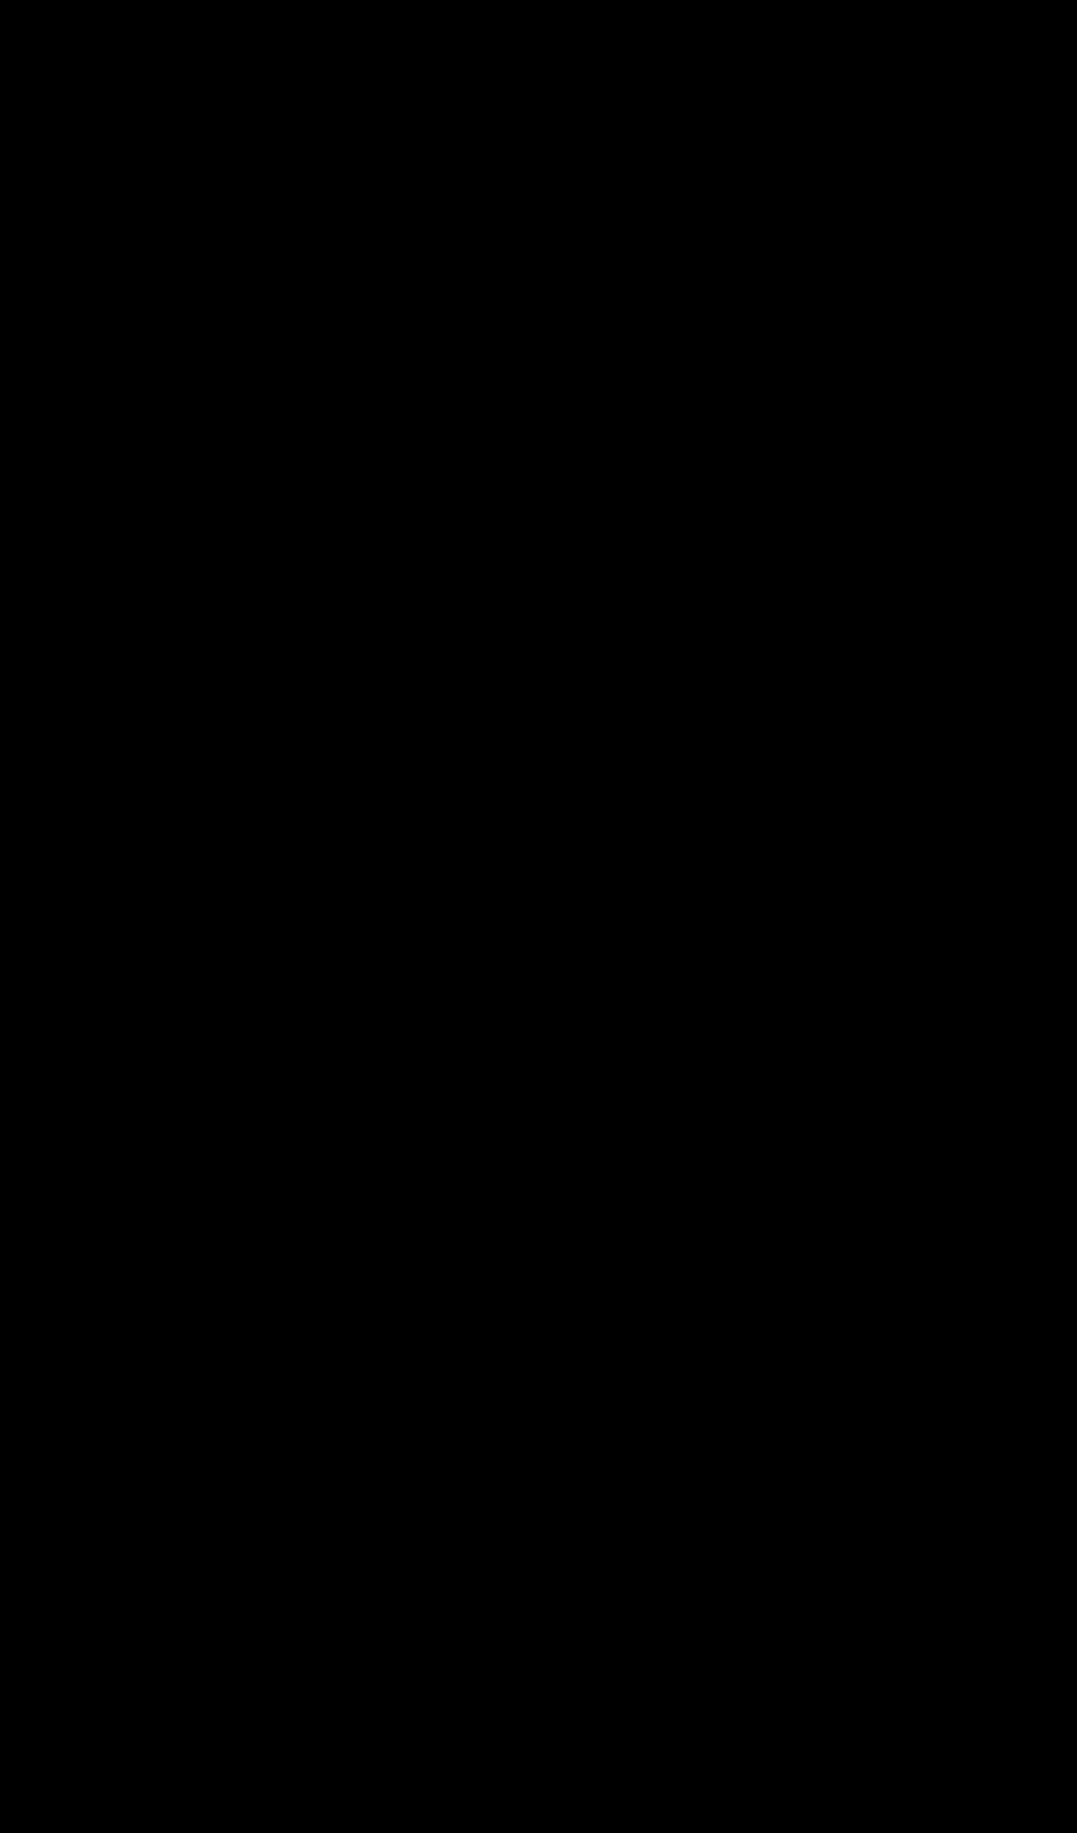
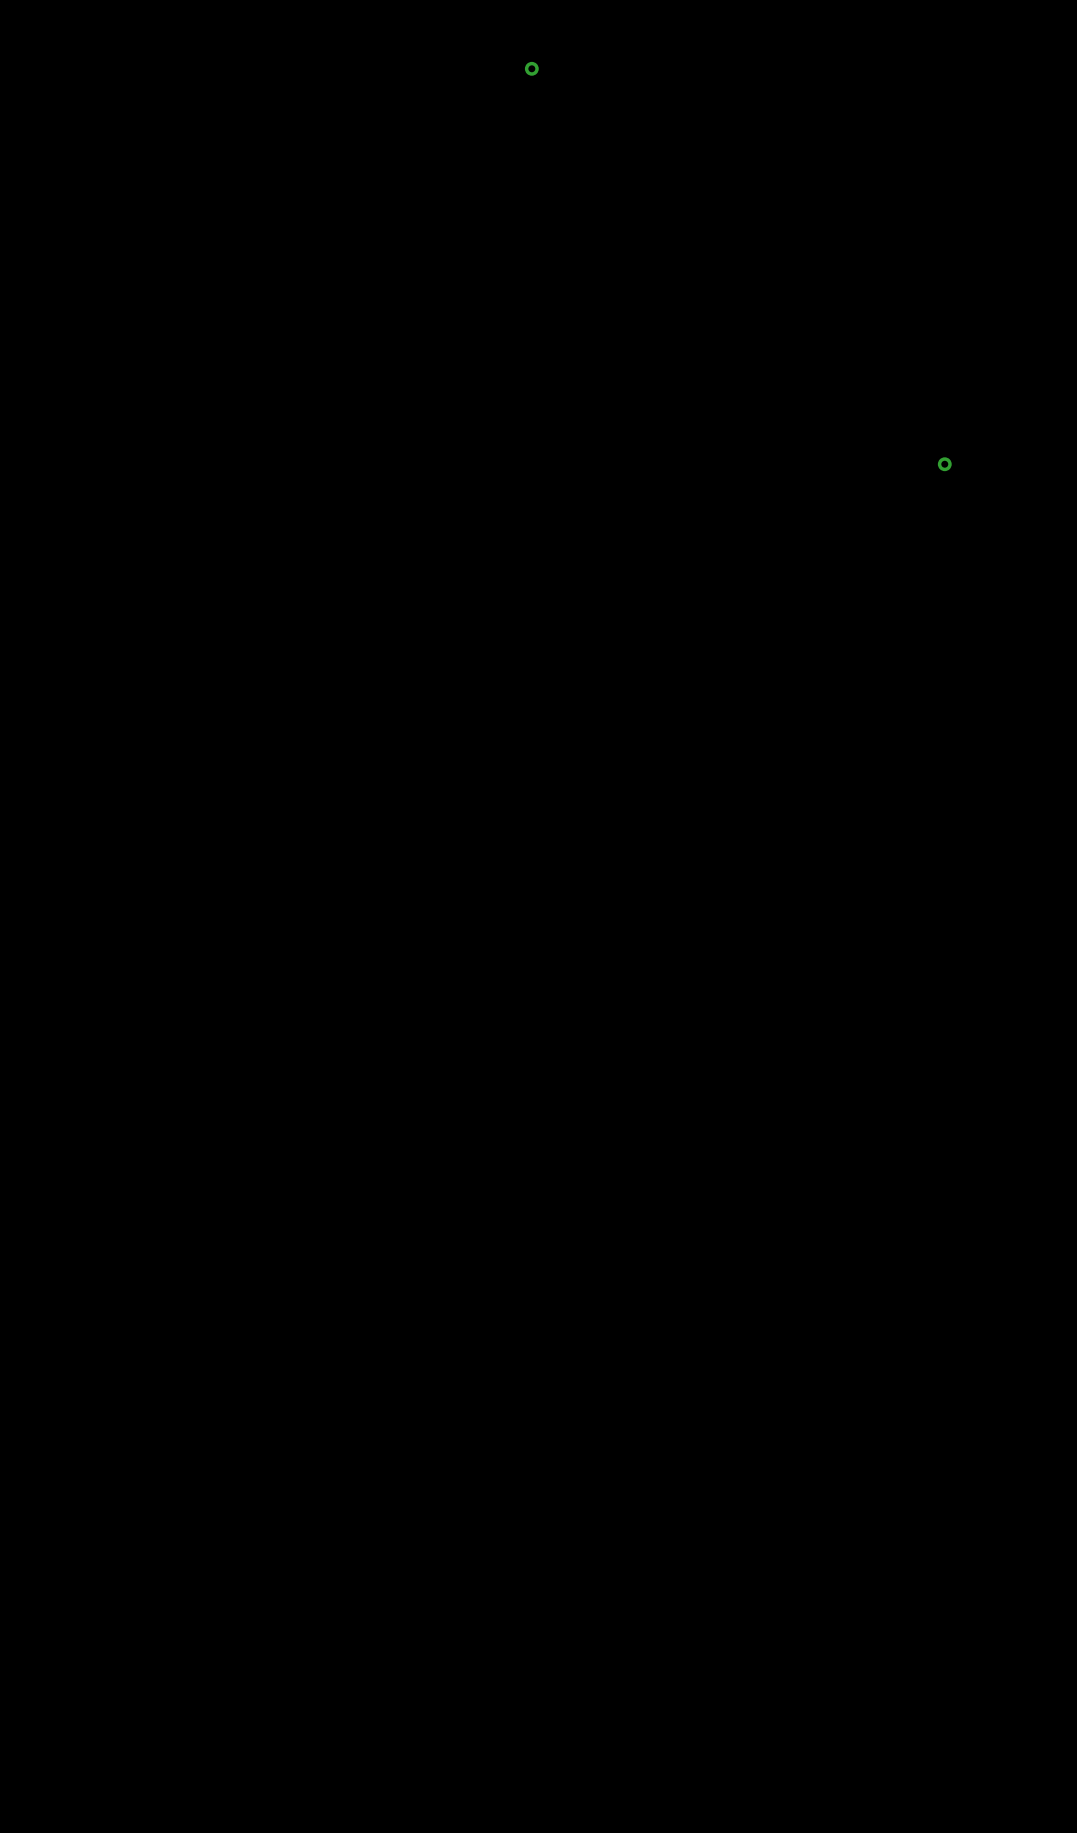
via: none -> (531, 68)
via: none -> (944, 464)

